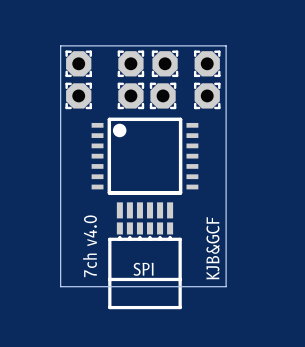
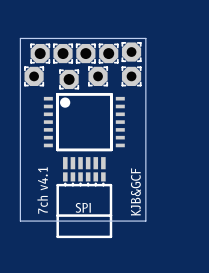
part footprint: [65, 50, 92, 78] -> [30, 43, 51, 64]
part: (130, 63) -> none
part: (165, 63) -> none
part: none -> (63, 53)
part: none -> (85, 53)
part: none -> (108, 53)
part footprint: [117, 82, 145, 110] -> [59, 69, 80, 90]
text: 7ch v4.0 (90, 246) -> 7ch v4.1 (42, 190)

